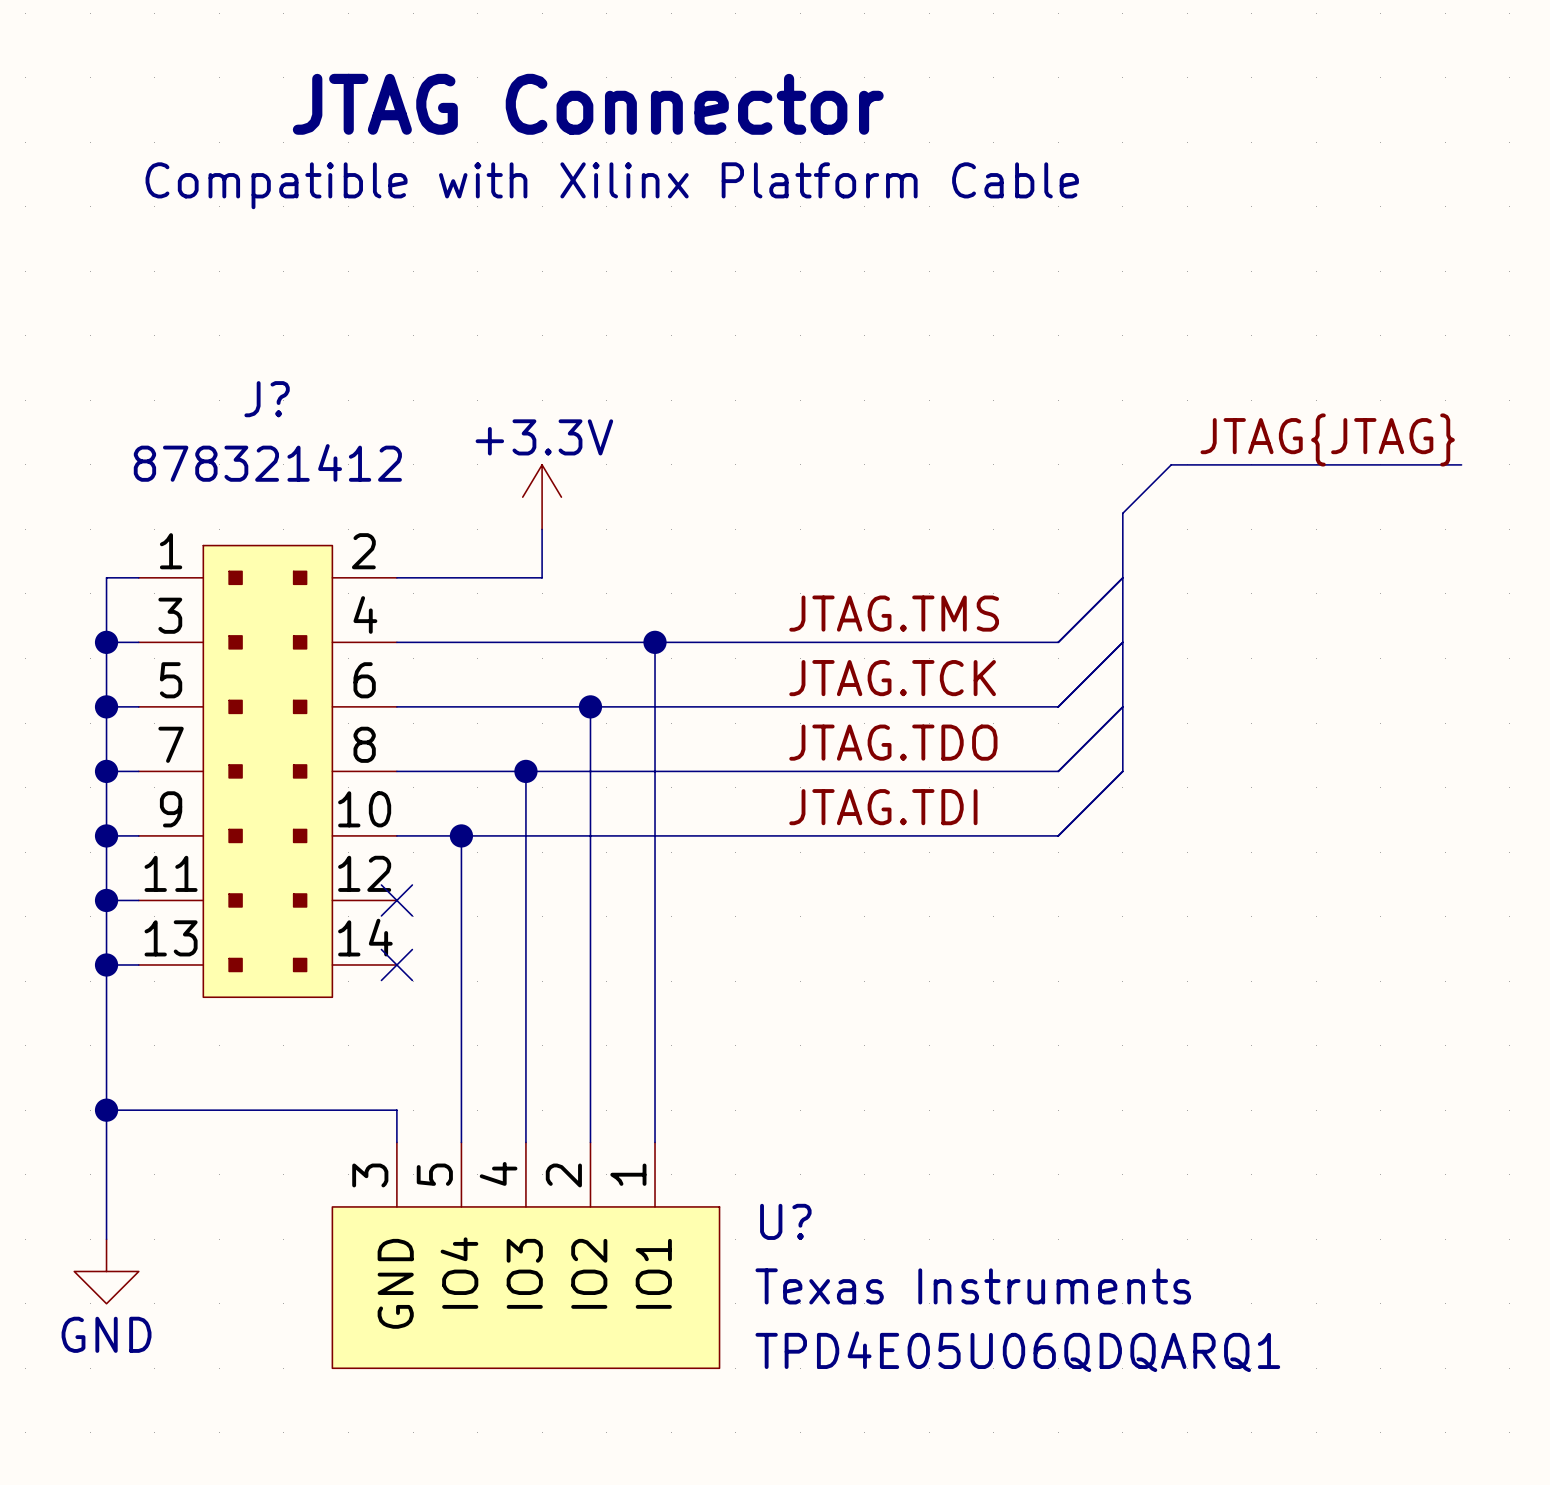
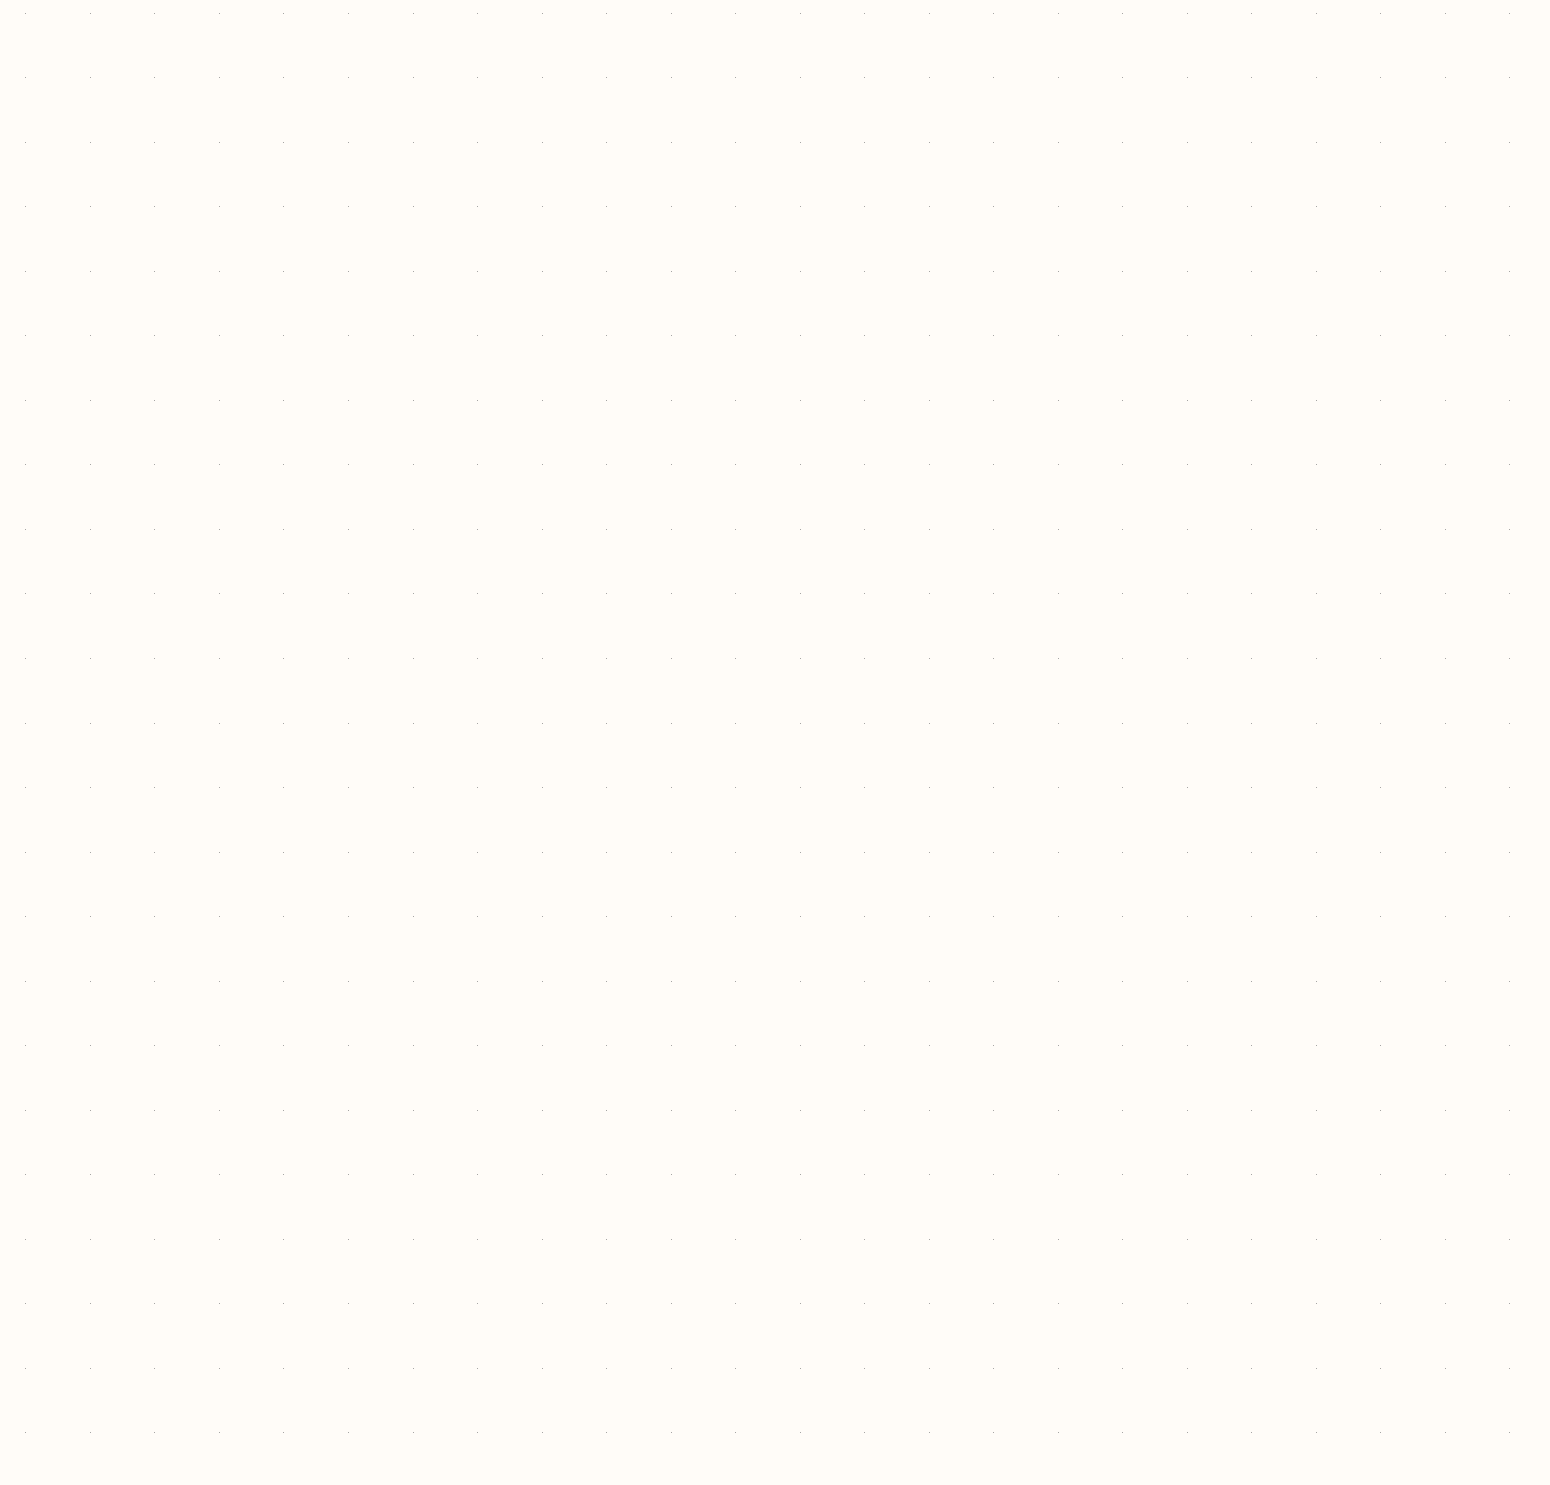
text: JTAG Connector (588, 104) -> none
text: Compatible with Xilinx Platform Cable (612, 185) -> none
label: JTAG{JTAG} (1327, 439) -> none
bus: (1461, 464) (1171, 464) (1122, 513) (1122, 771) -> none
power symbol: +3.3V (542, 497) -> none
wire: (542, 529) (542, 577) (396, 577) -> none
wire: (138, 577) (106, 577) (106, 1239) -> none
wire: (1122, 577) (1058, 642) (396, 642) -> none
label: JTAG.TMS (894, 613) -> none
wire: (106, 642) (138, 642) -> none
junction: (106, 642) -> none
wire: (655, 642) (655, 1142) -> none
junction: (655, 642) -> none
wire: (1122, 642) (1058, 706) -> none
label: JTAG.TCK (892, 678) -> none
wire: (106, 706) (138, 706) -> none
junction: (106, 706) -> none
wire: (396, 706) (1058, 706) -> none
wire: (590, 706) (590, 1142) -> none
junction: (590, 706) -> none
wire: (1122, 706) (1058, 771) (396, 771) -> none
label: JTAG.TDO (893, 742) -> none
wire: (106, 771) (138, 771) -> none
junction: (106, 771) -> none
J?: 878321412 (267, 771) -> none
wire: (525, 771) (525, 1142) -> none
junction: (525, 771) -> none
wire: (1122, 771) (1058, 835) (396, 835) -> none
label: JTAG.TDI (883, 807) -> none
wire: (106, 835) (138, 835) -> none
junction: (106, 835) -> none
wire: (461, 835) (461, 1142) -> none
junction: (461, 835) -> none
wire: (106, 900) (138, 900) -> none
junction: (106, 900) -> none
no-connect mark: (396, 900) -> none
wire: (106, 964) (138, 964) -> none
junction: (106, 964) -> none
no-connect mark: (396, 964) -> none
wire: (106, 1110) (396, 1110) (396, 1142) -> none
junction: (106, 1110) -> none
U?: (525, 1255) -> none
power symbol: GND (106, 1271) -> none

